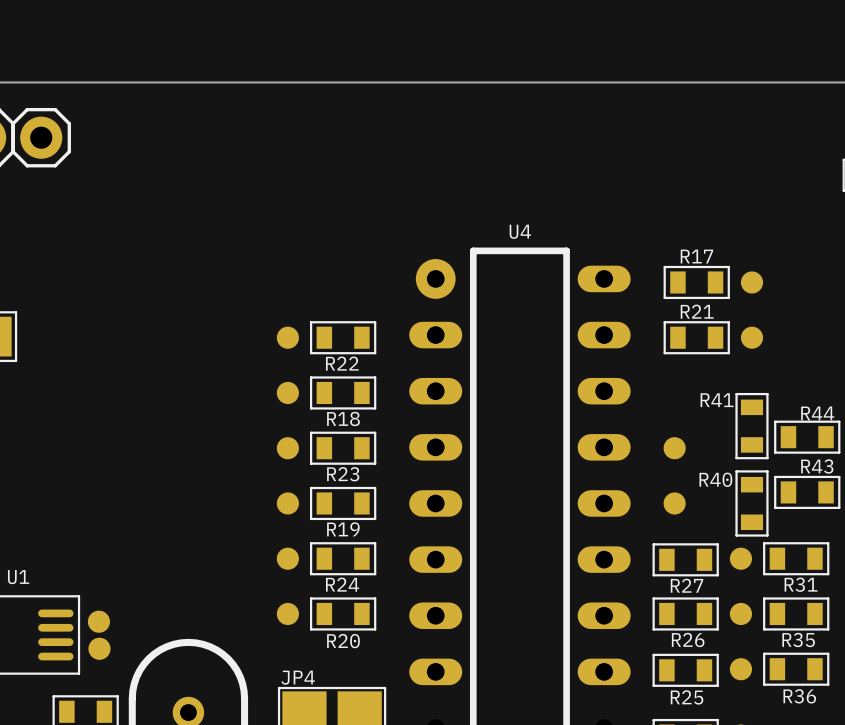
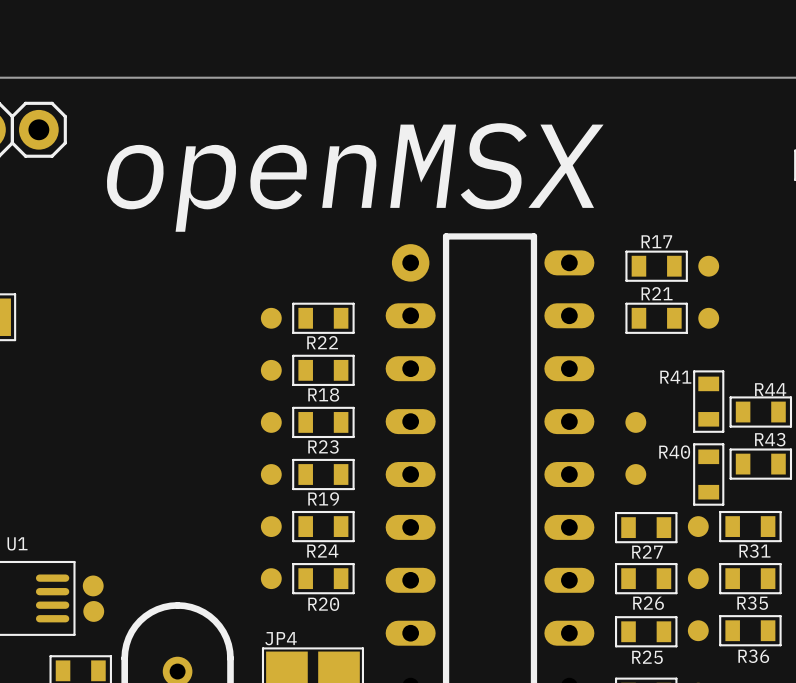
text: none -> openMSX (354, 177)
U4 name: U4 (520, 231) -> none

